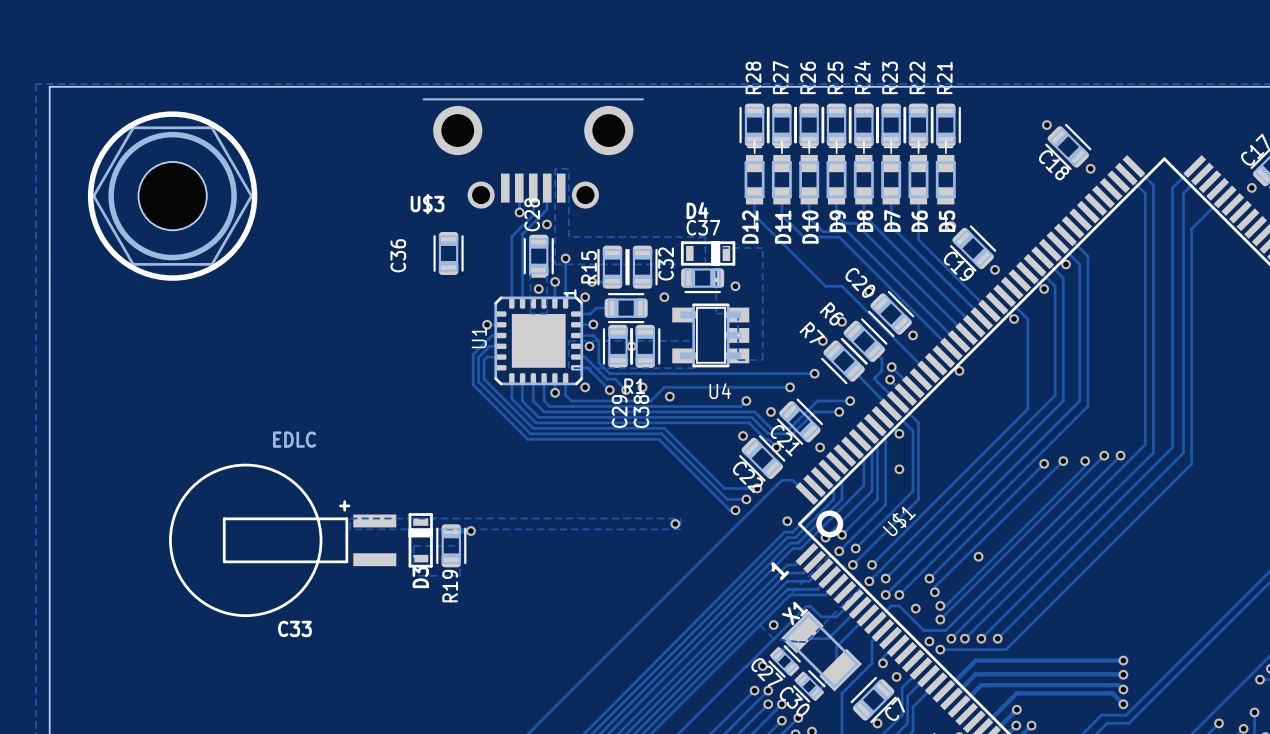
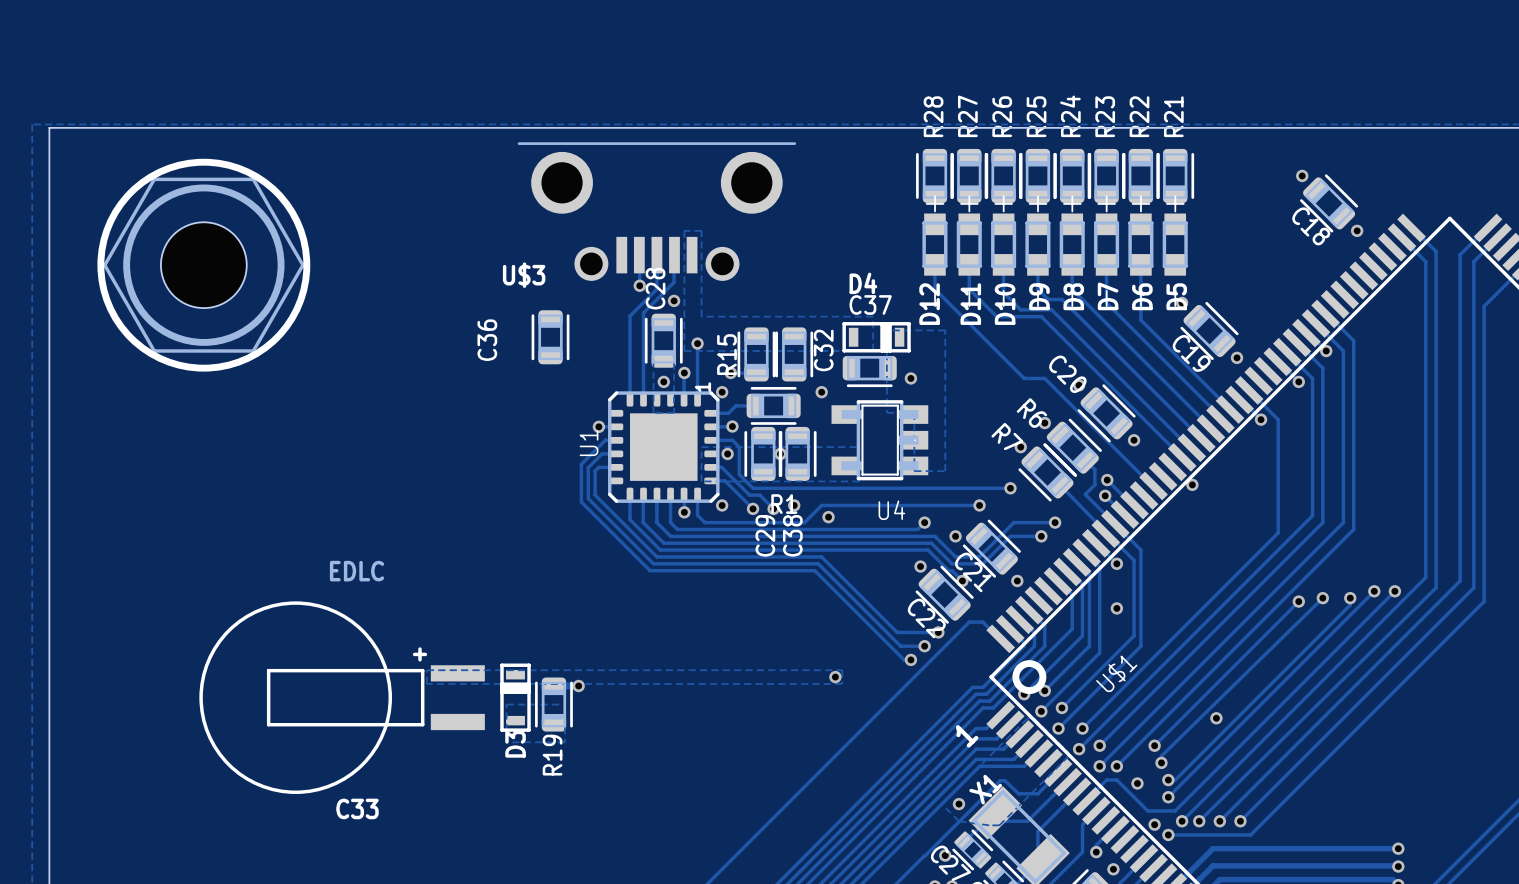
via: (787, 521) -> none

